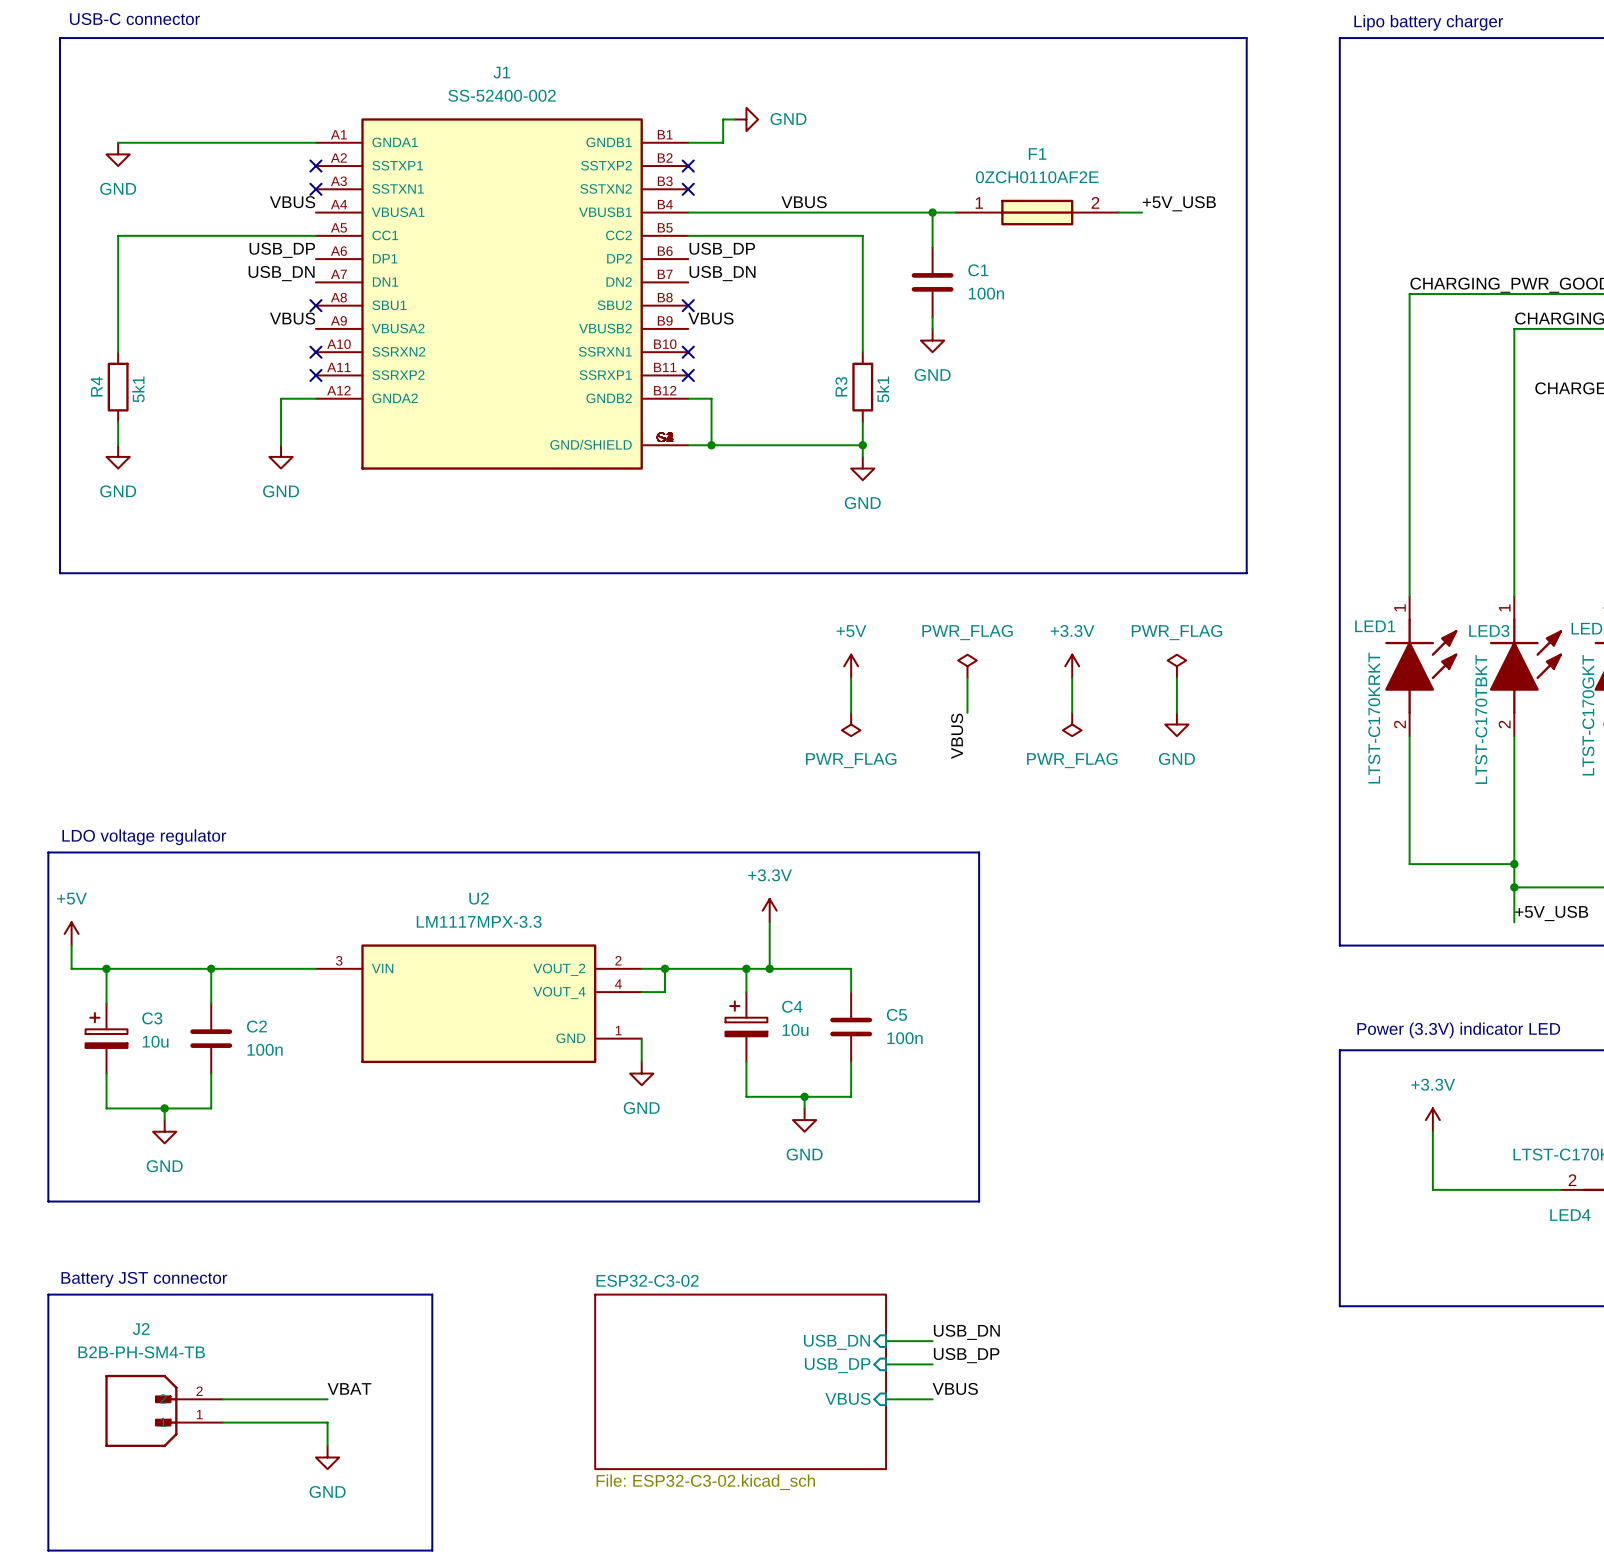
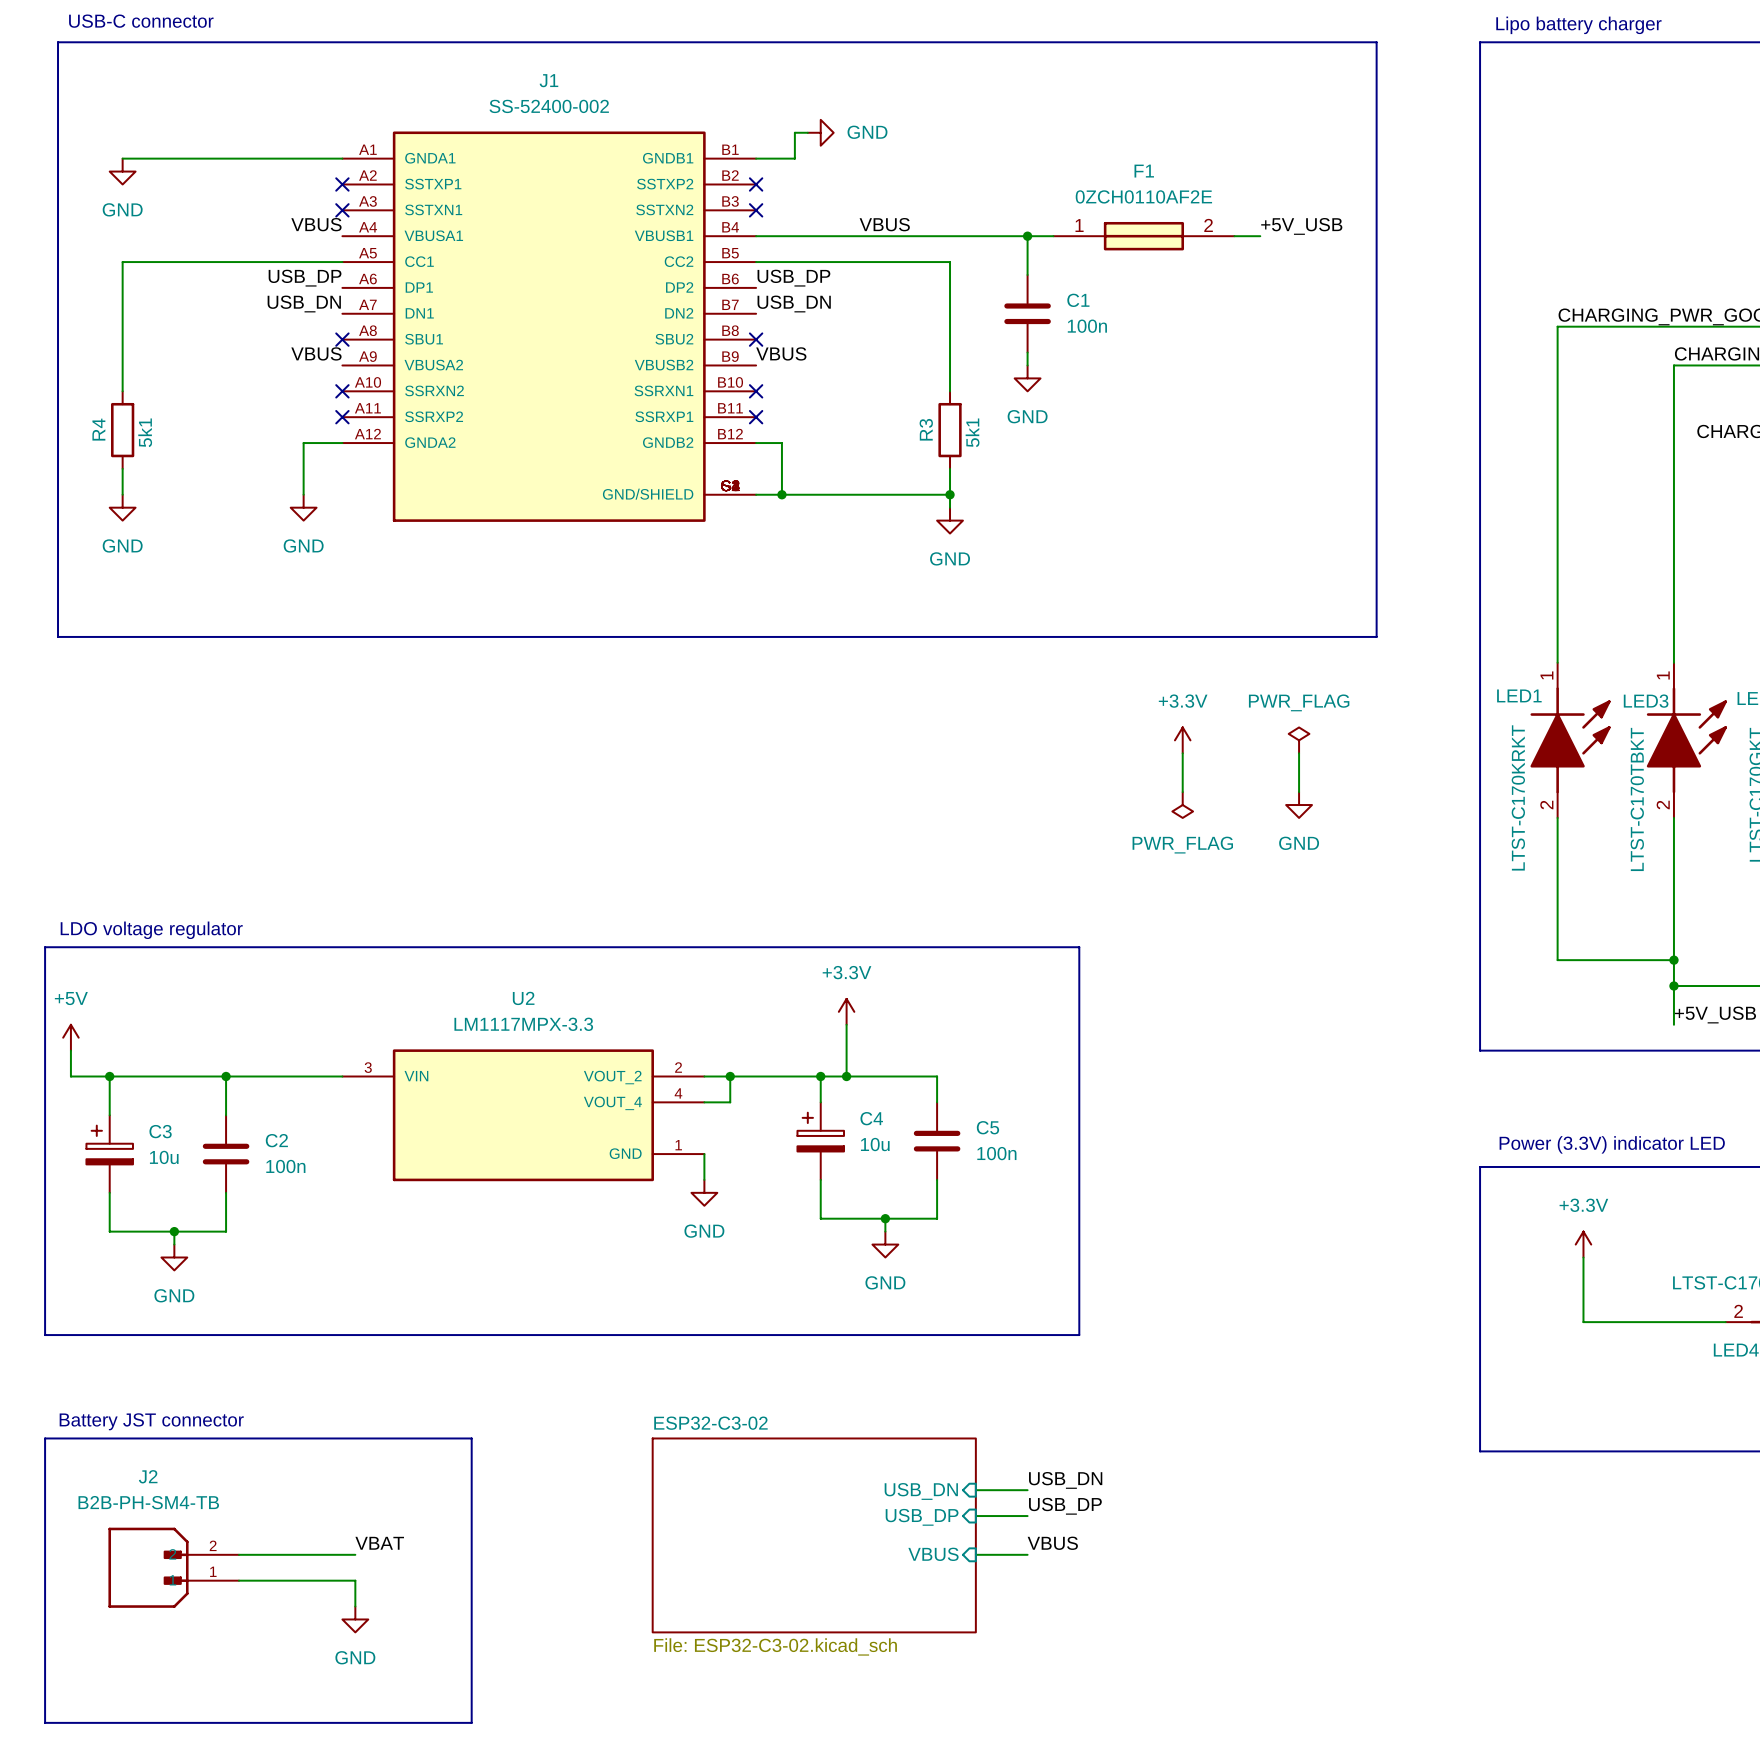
power symbol: +5V (851, 666) -> none
power symbol: PWR_FLAG (967, 666) -> none
wire: (851, 677) (851, 712) -> none
wire: (967, 677) (967, 712) -> none
power symbol: PWR_FLAG (851, 724) -> none
label: VBUS (957, 736) -> none

